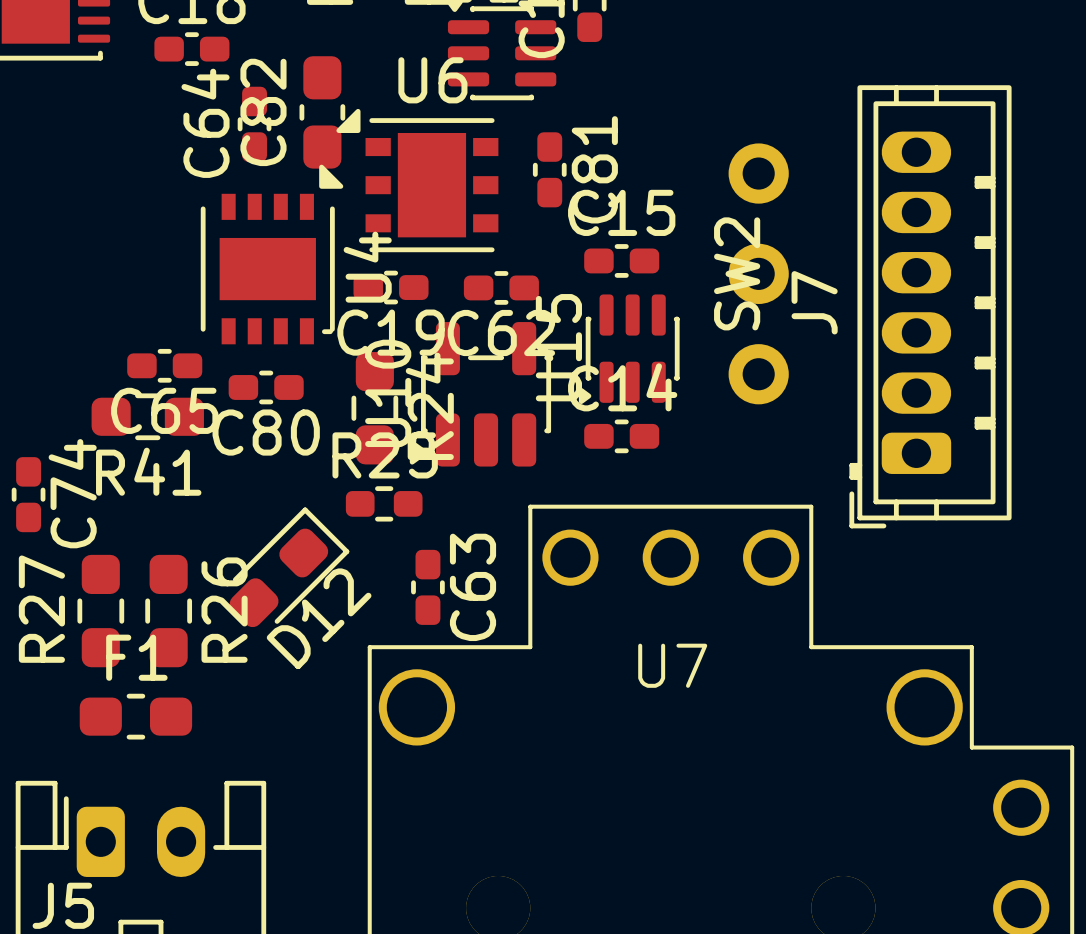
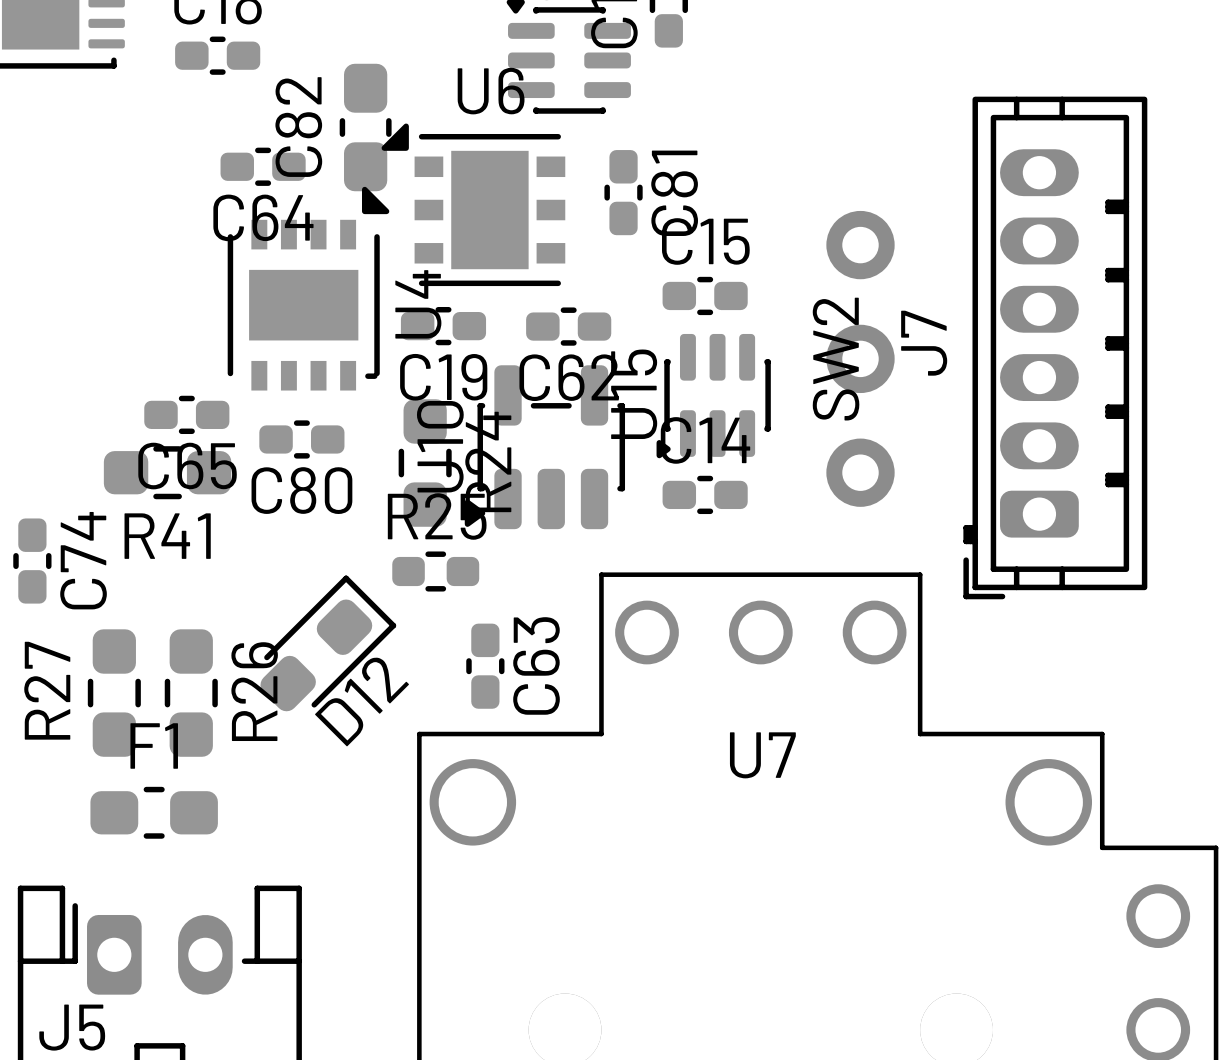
C64 rotation: 0° (254, 124) -> 90° clockwise (263, 166)
SW2 position: (758, 273) -> (860, 358)

